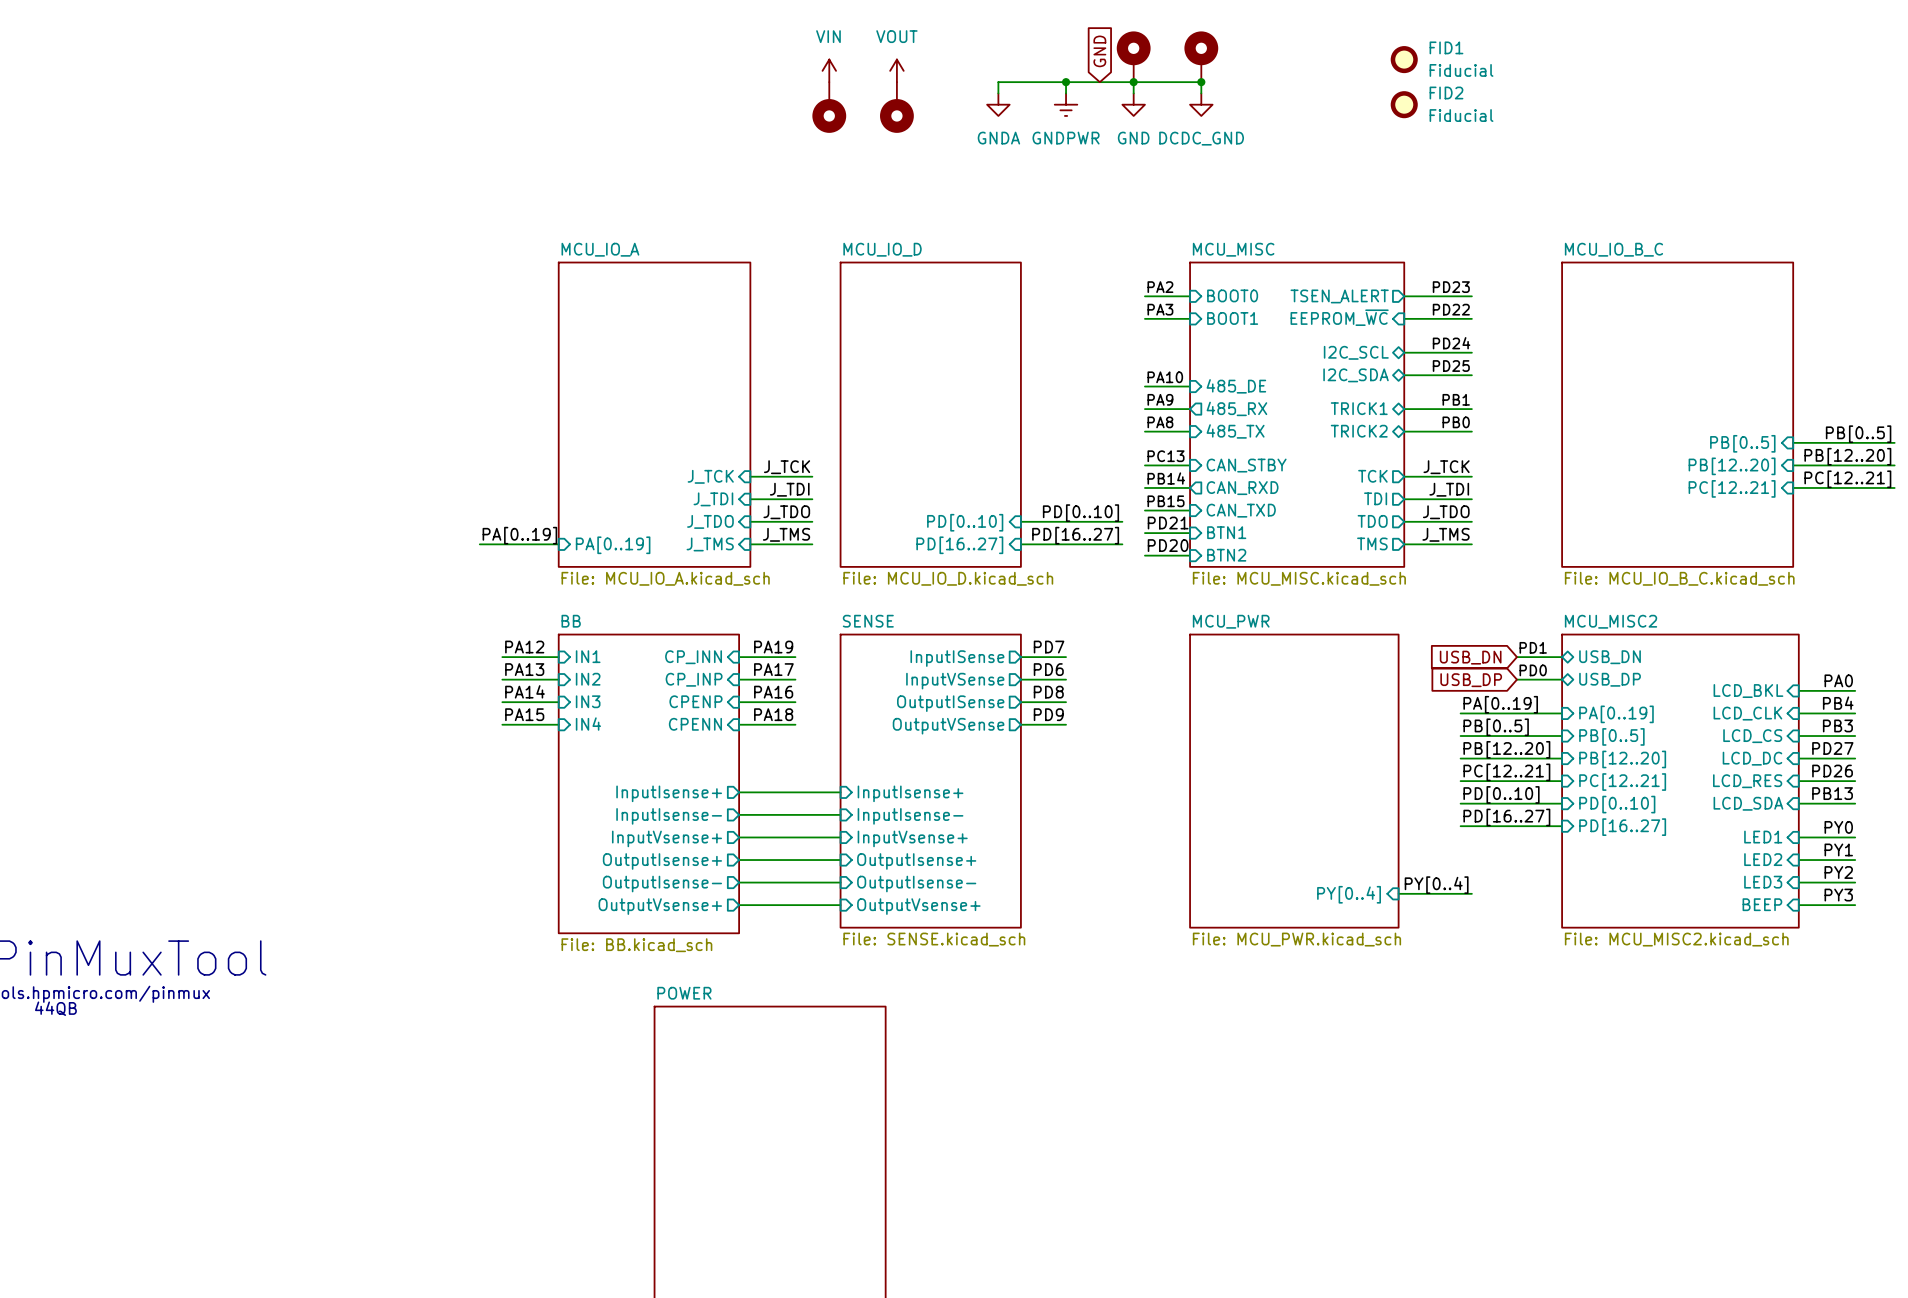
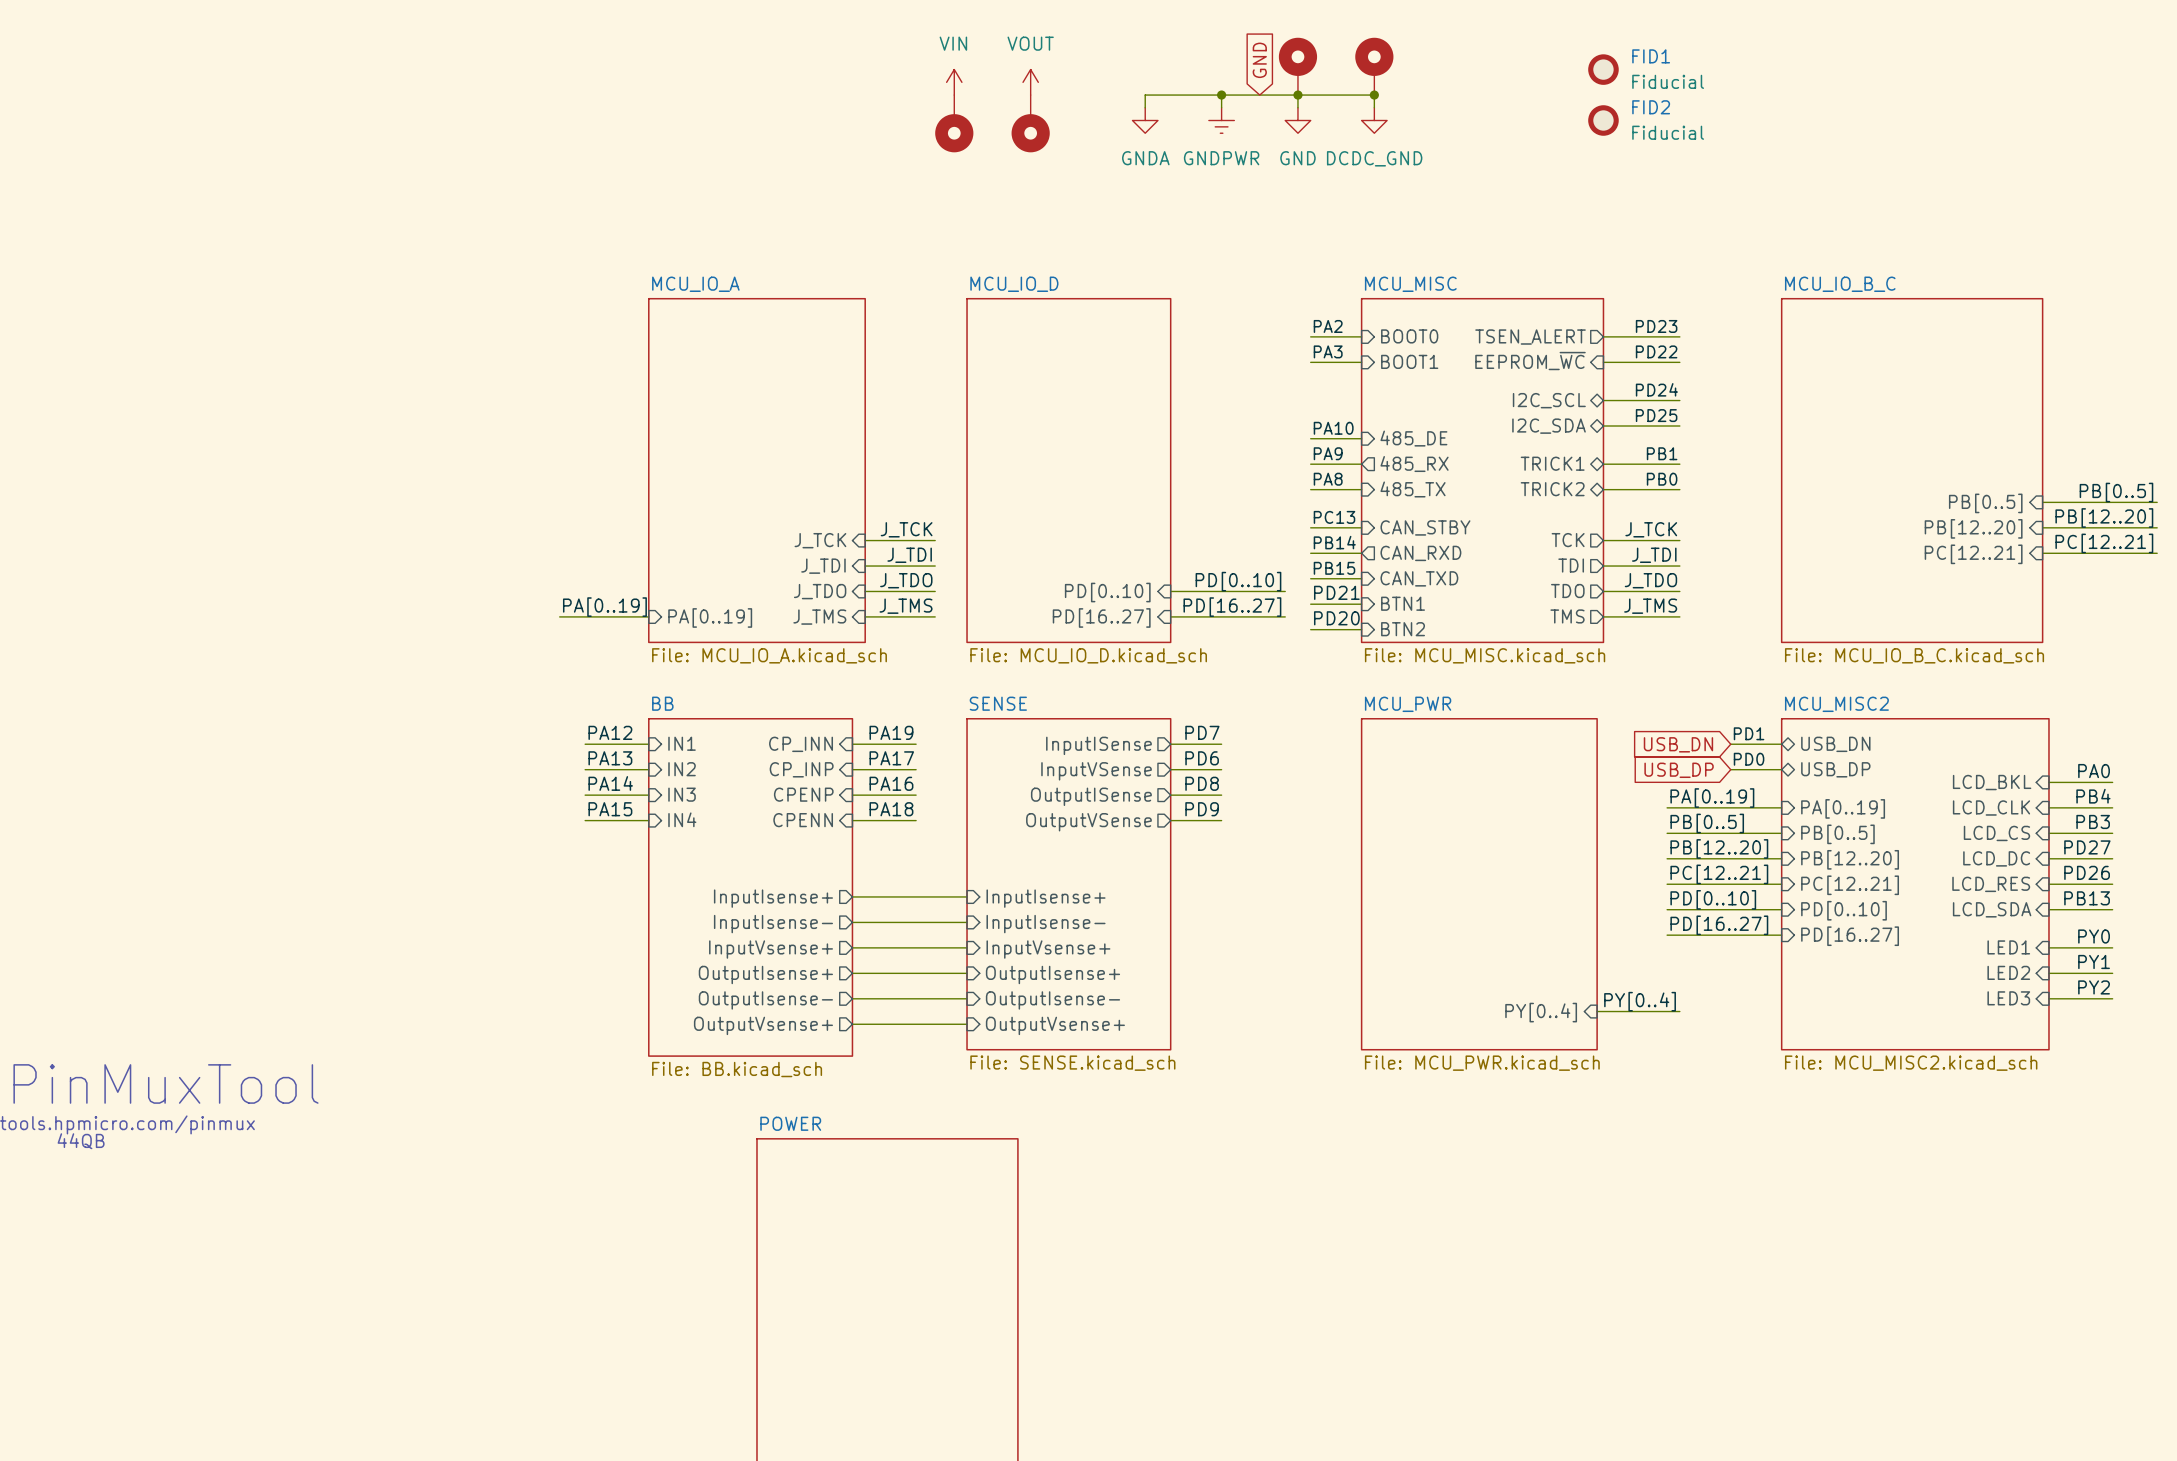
label: PY3 (1838, 895) -> none
sheet pin: BEEP (1762, 904) -> none
wire: (1798, 905) (1855, 905) -> none

